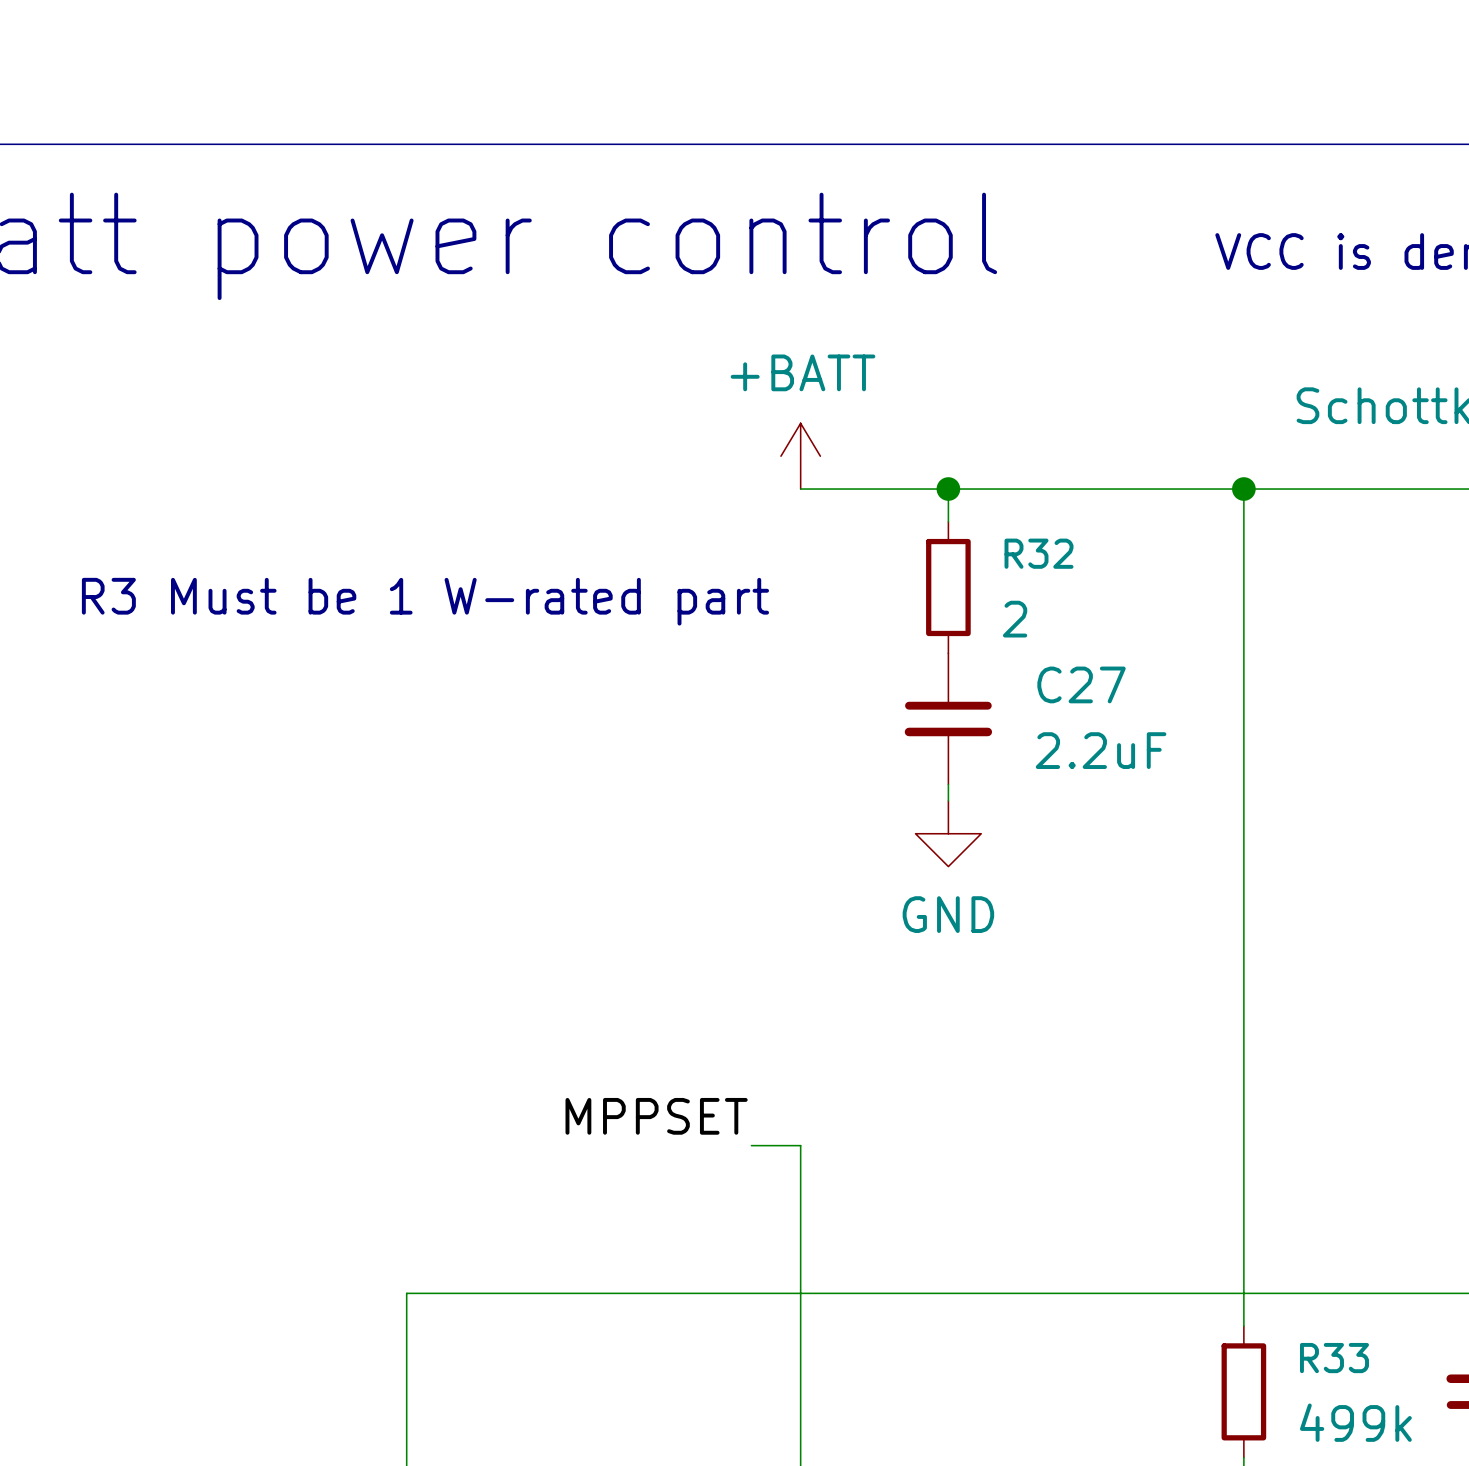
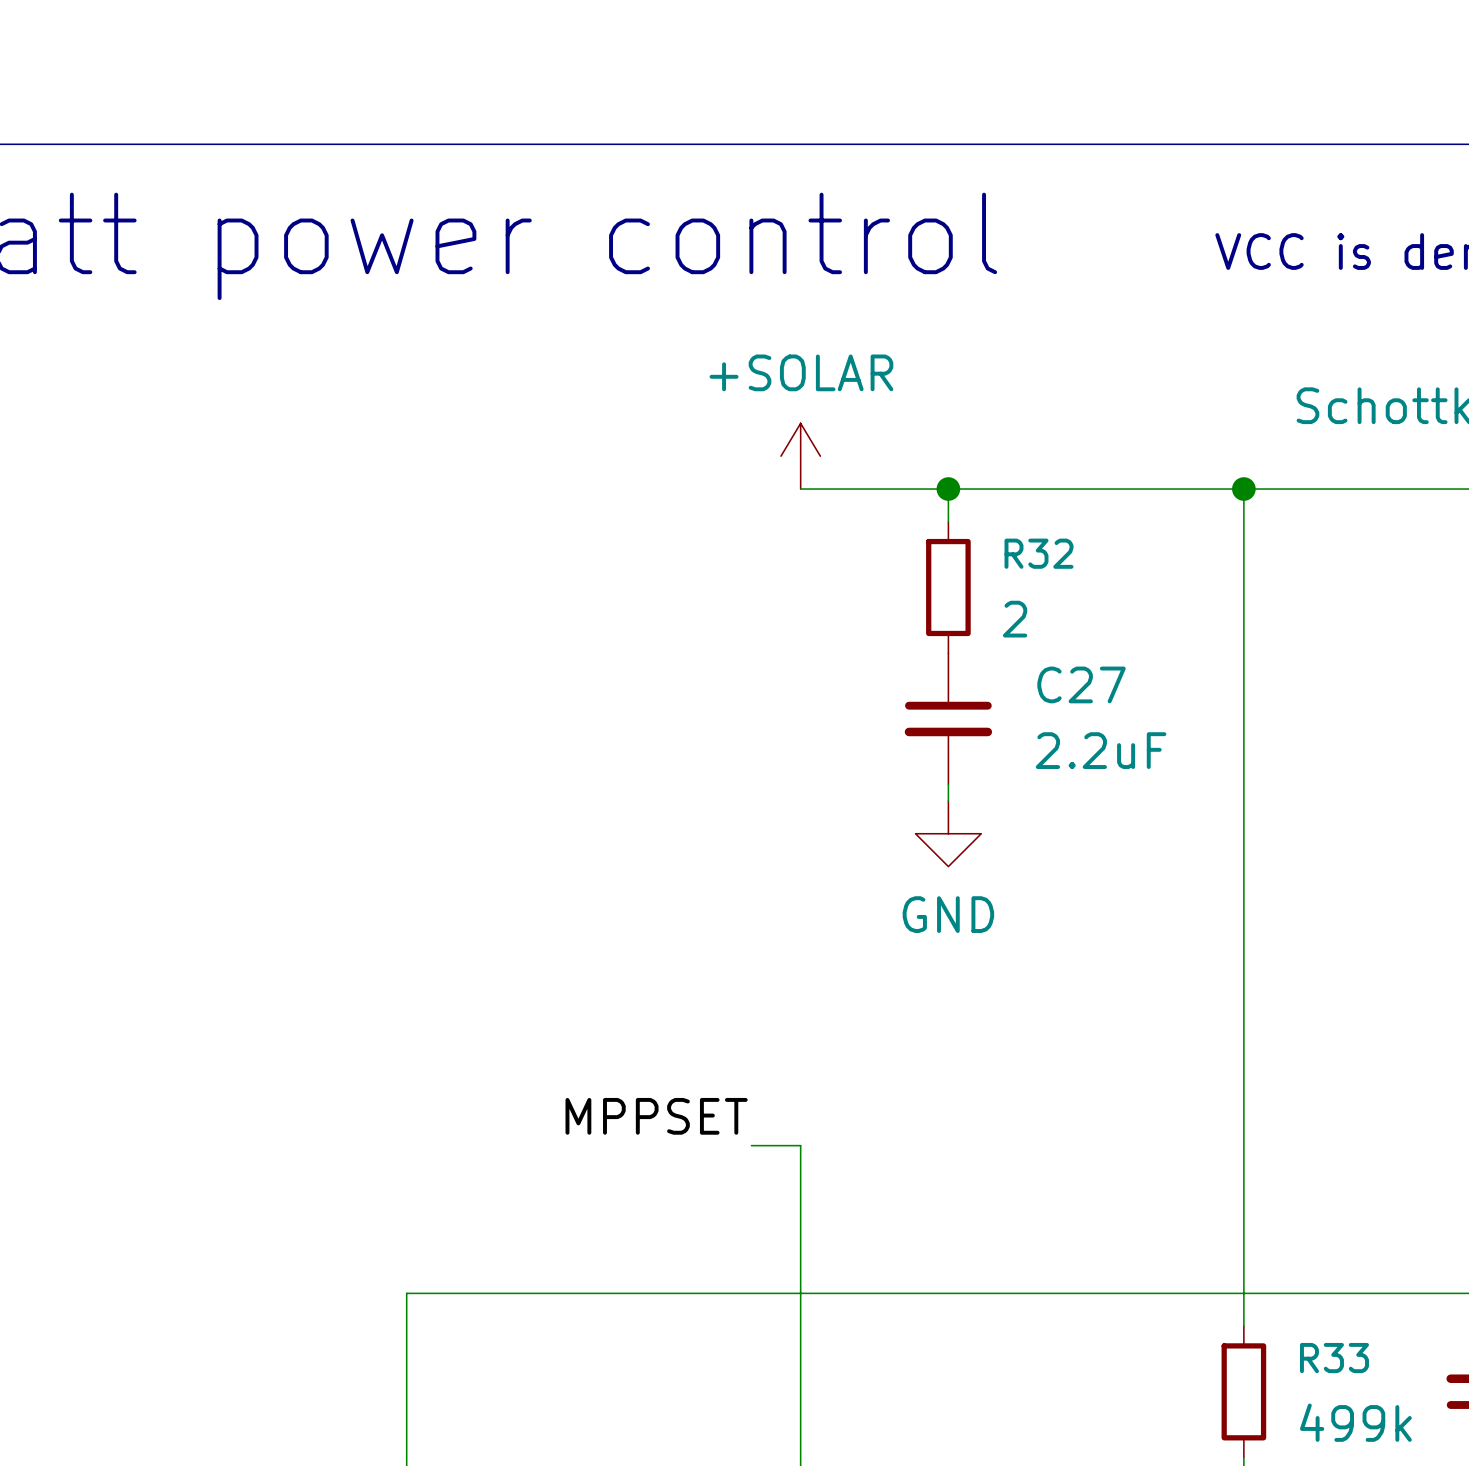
power symbol: +BATT (800, 456) -> +SOLAR (800, 456)
text: R3 Must be 1 W-rated part (425, 601) -> none

